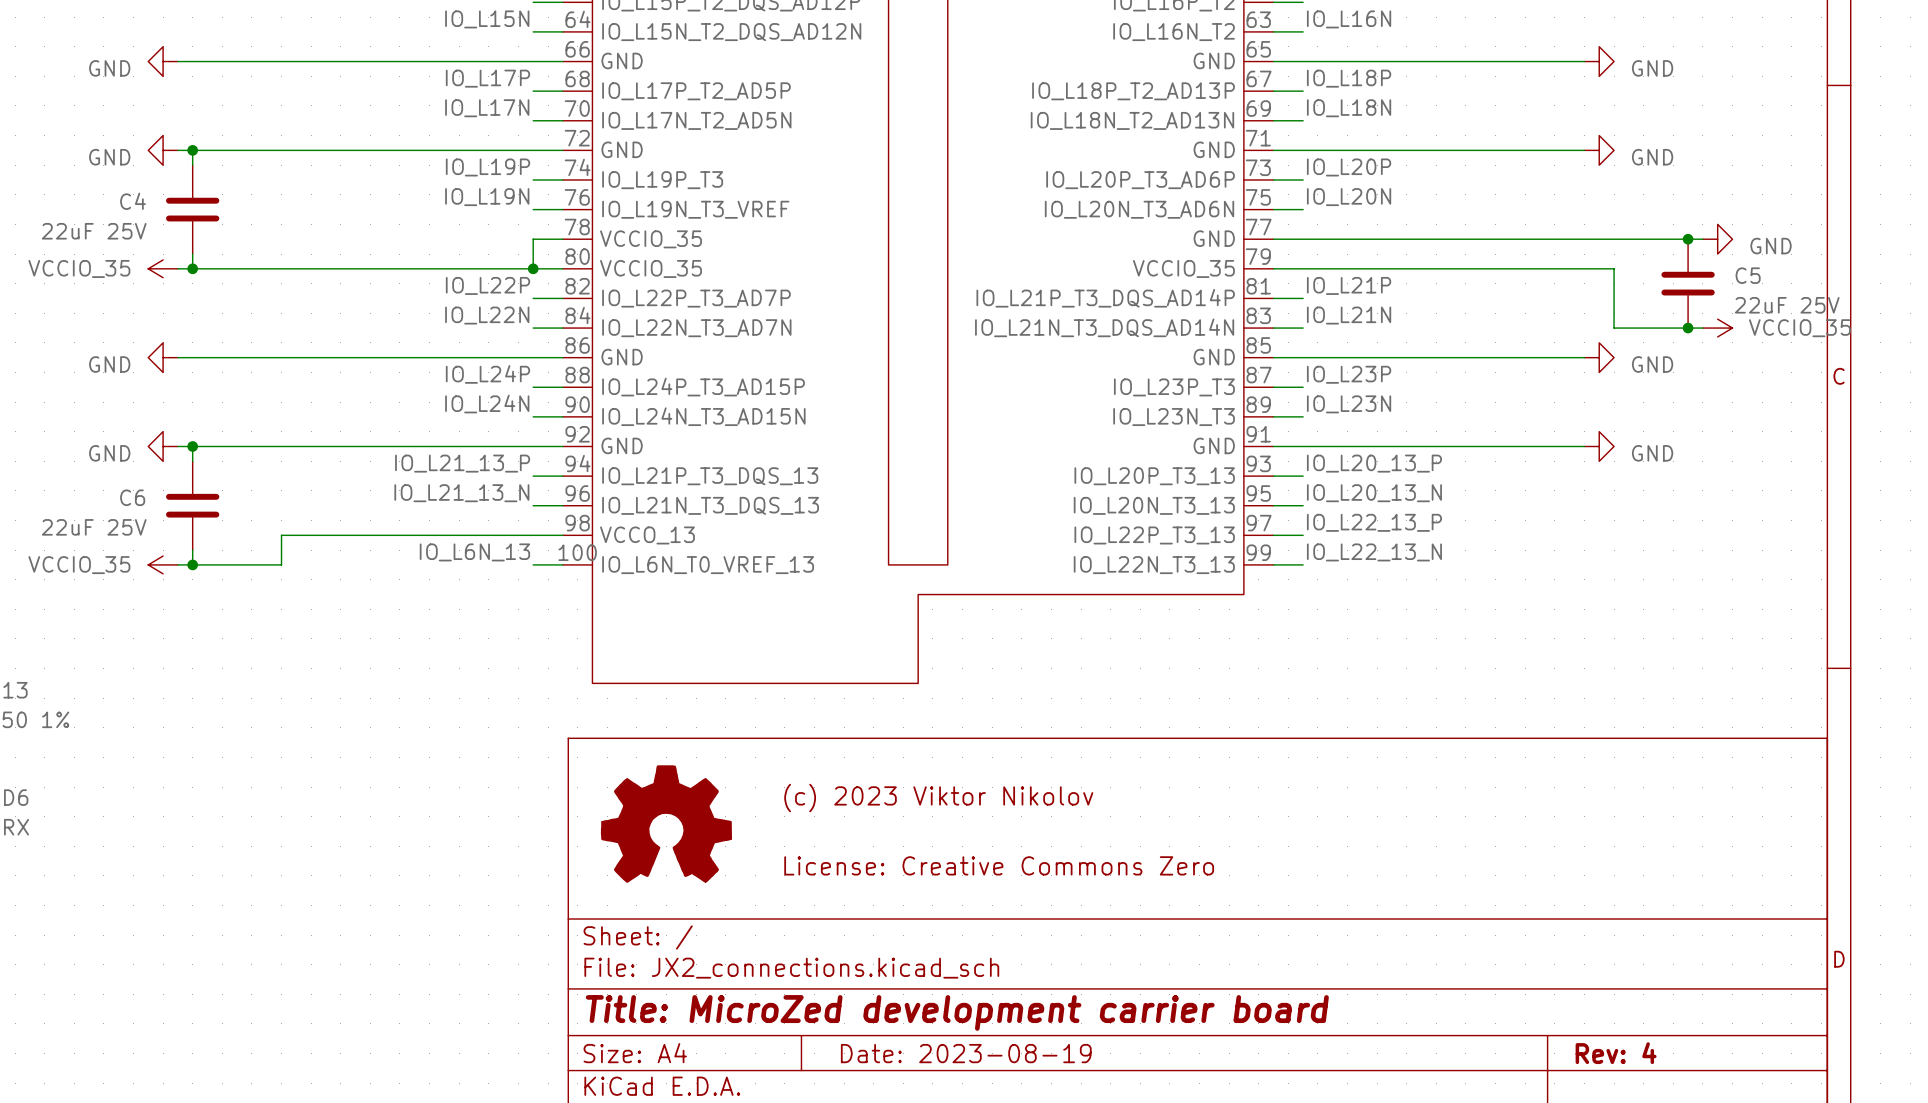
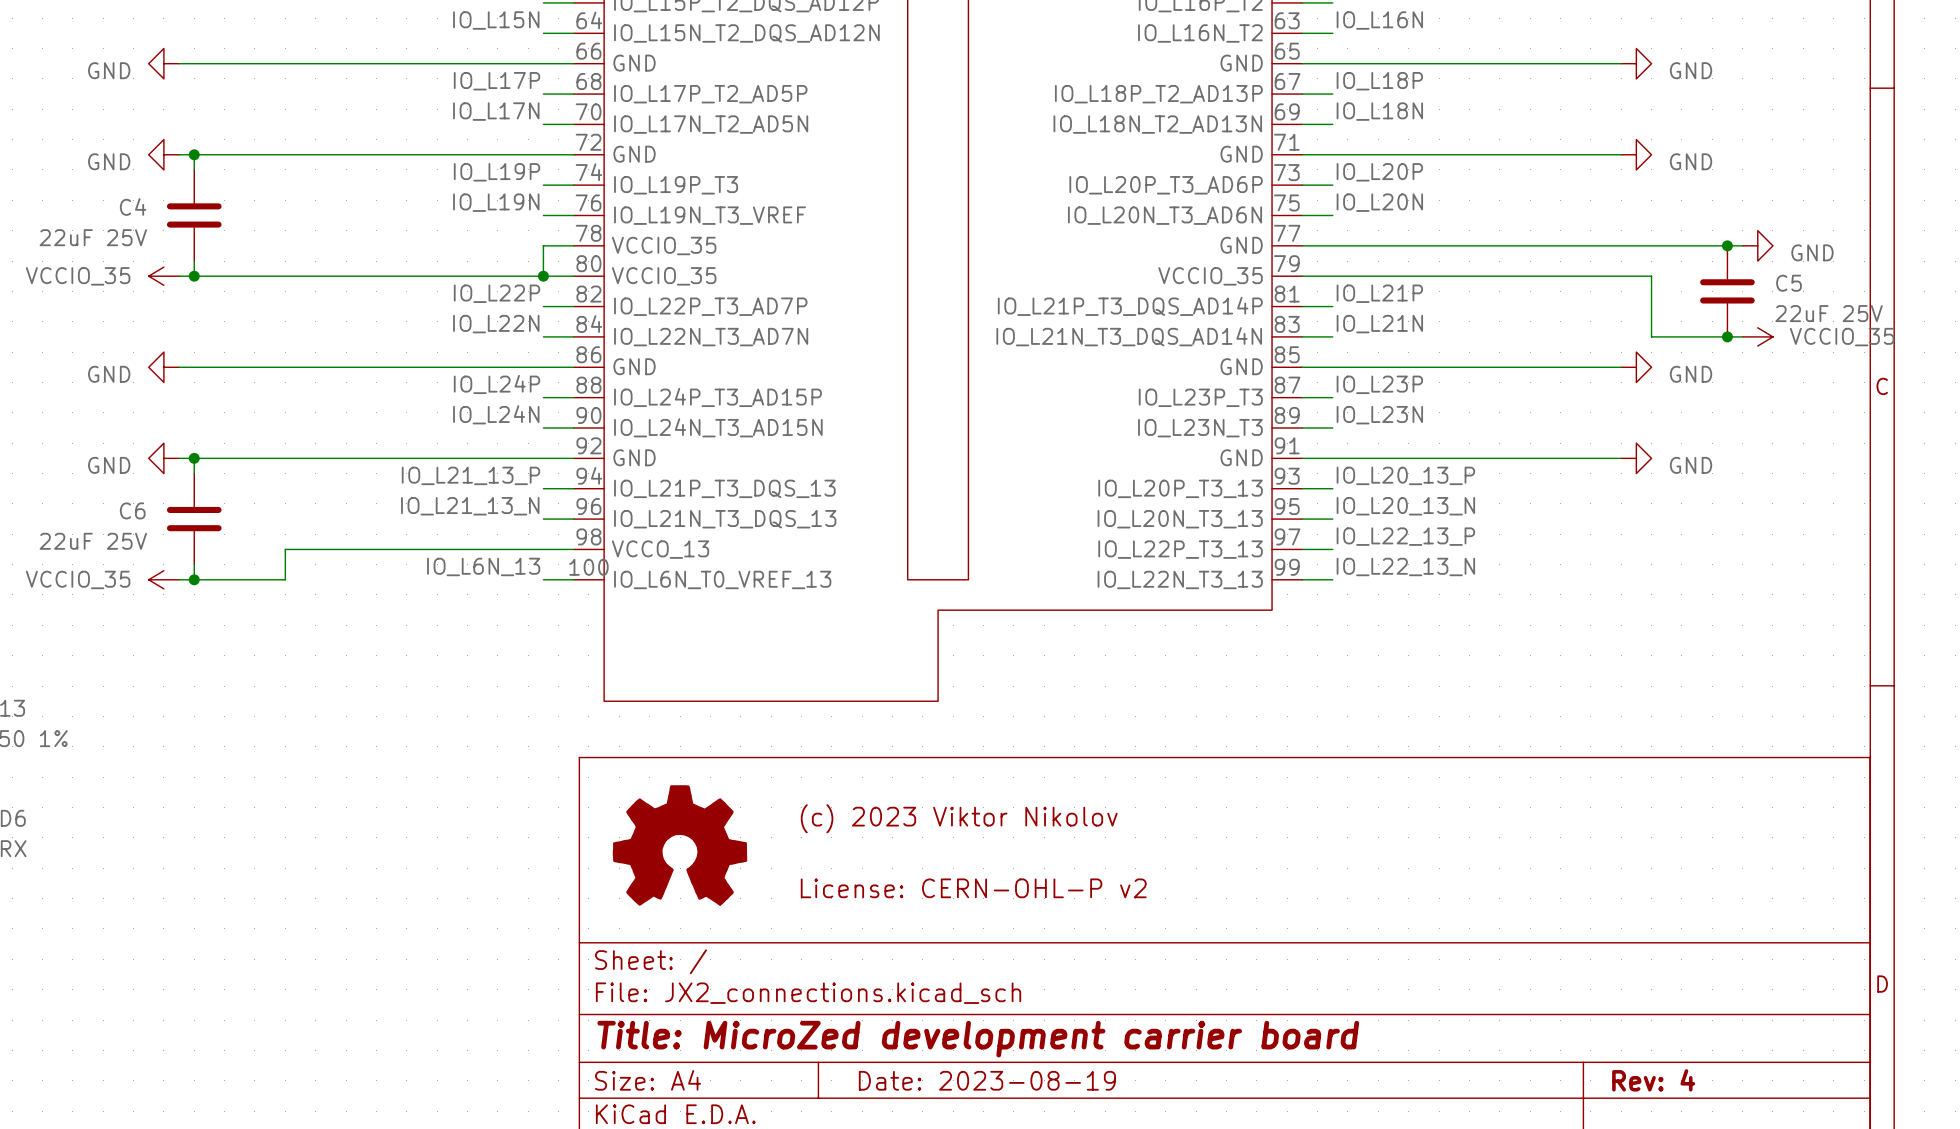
title block: License: Creative Commons Zero (999, 865) -> License: CERN-OHL-P v2 (973, 888)

